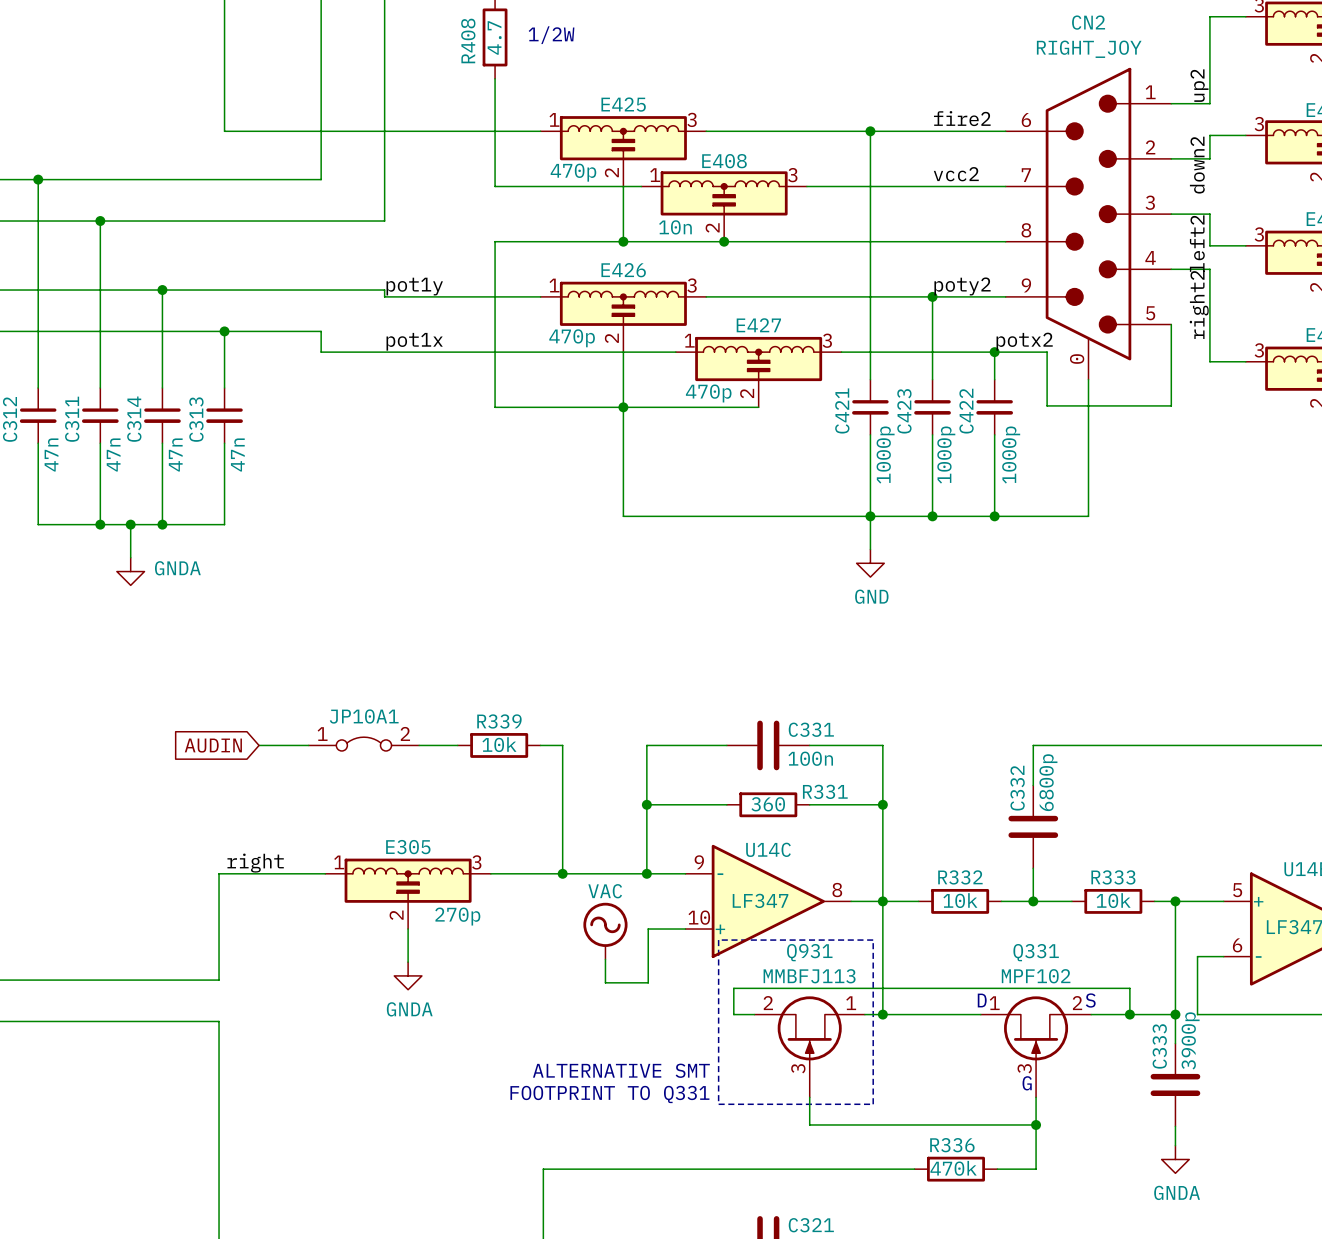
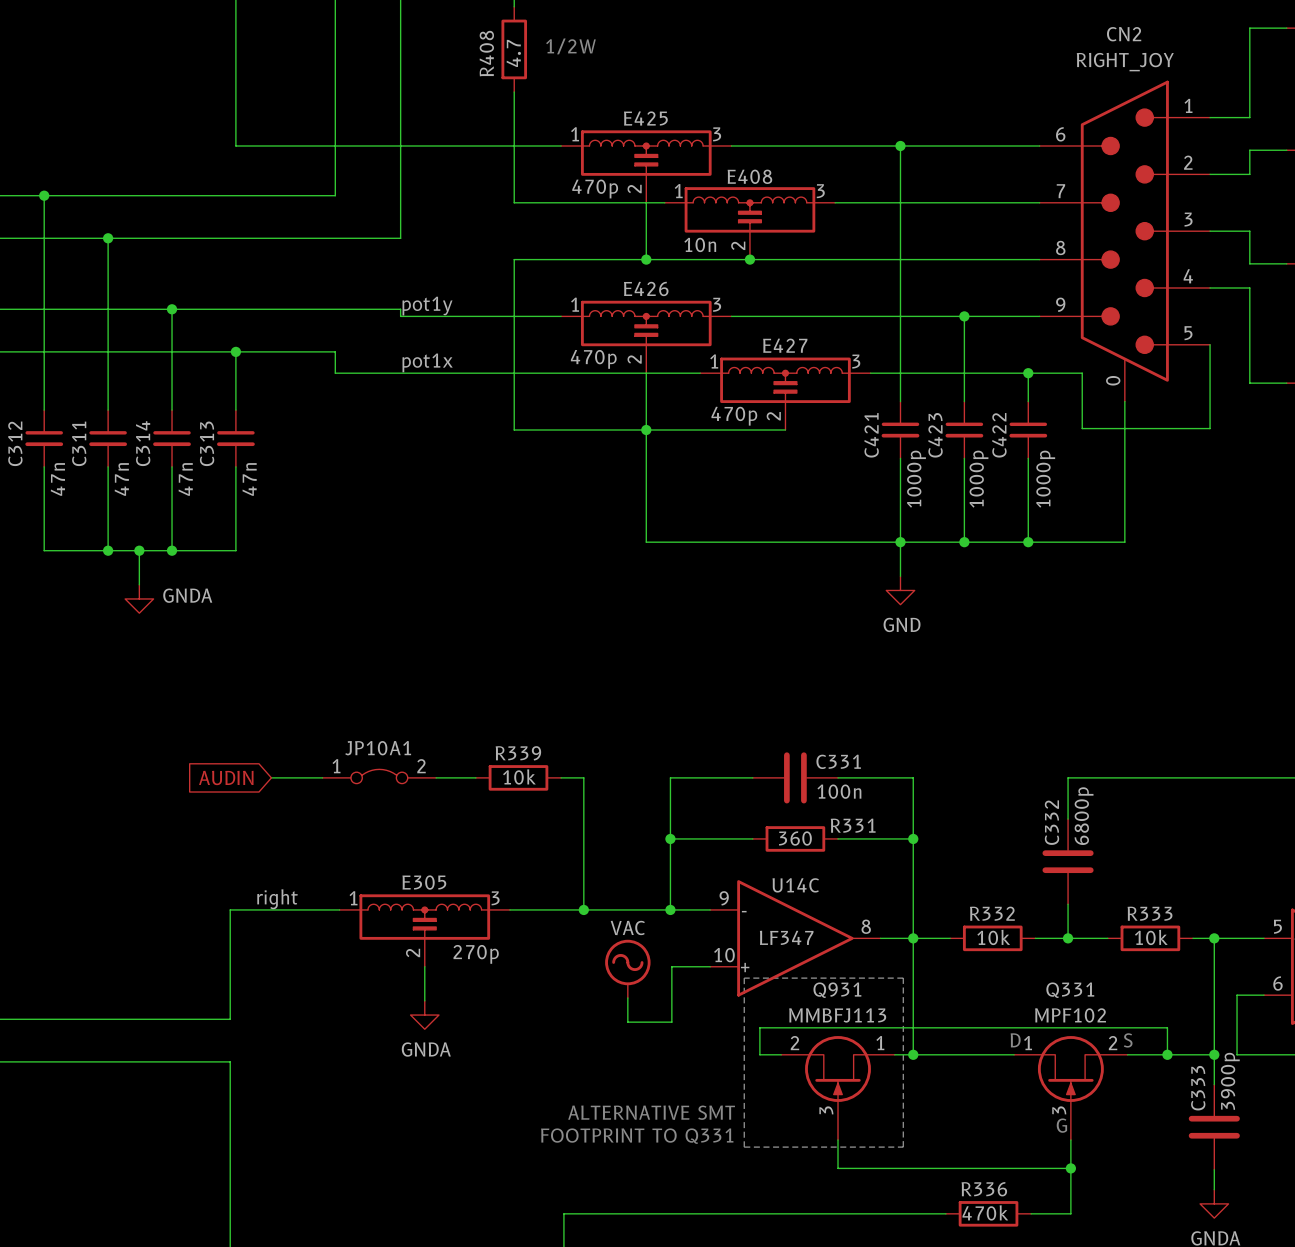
label: up2 (1199, 85) -> none
label: fire2 (962, 118) -> none
label: down2 (1197, 165) -> none
label: vcc2 (956, 174) -> none
label: left2 (1197, 243) -> none
label: poty2 (962, 286) -> none
label: right2 (1199, 304) -> none
label: potx2 (1024, 341) -> none

